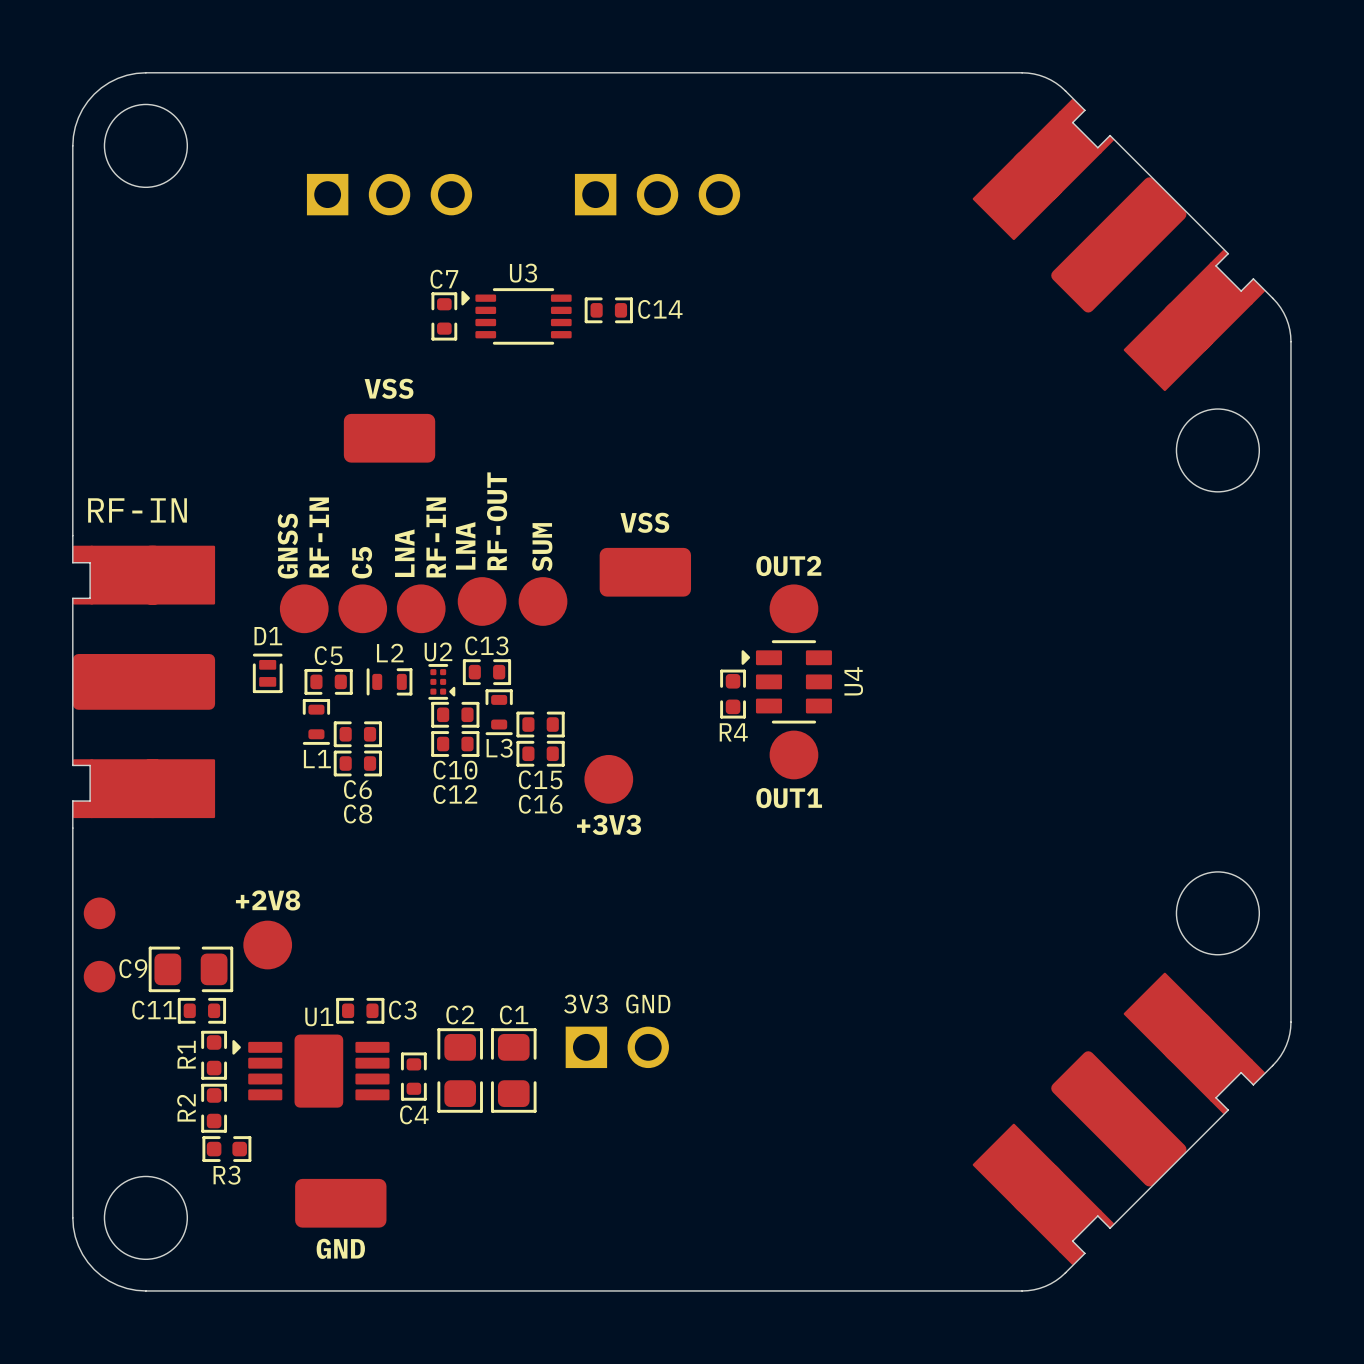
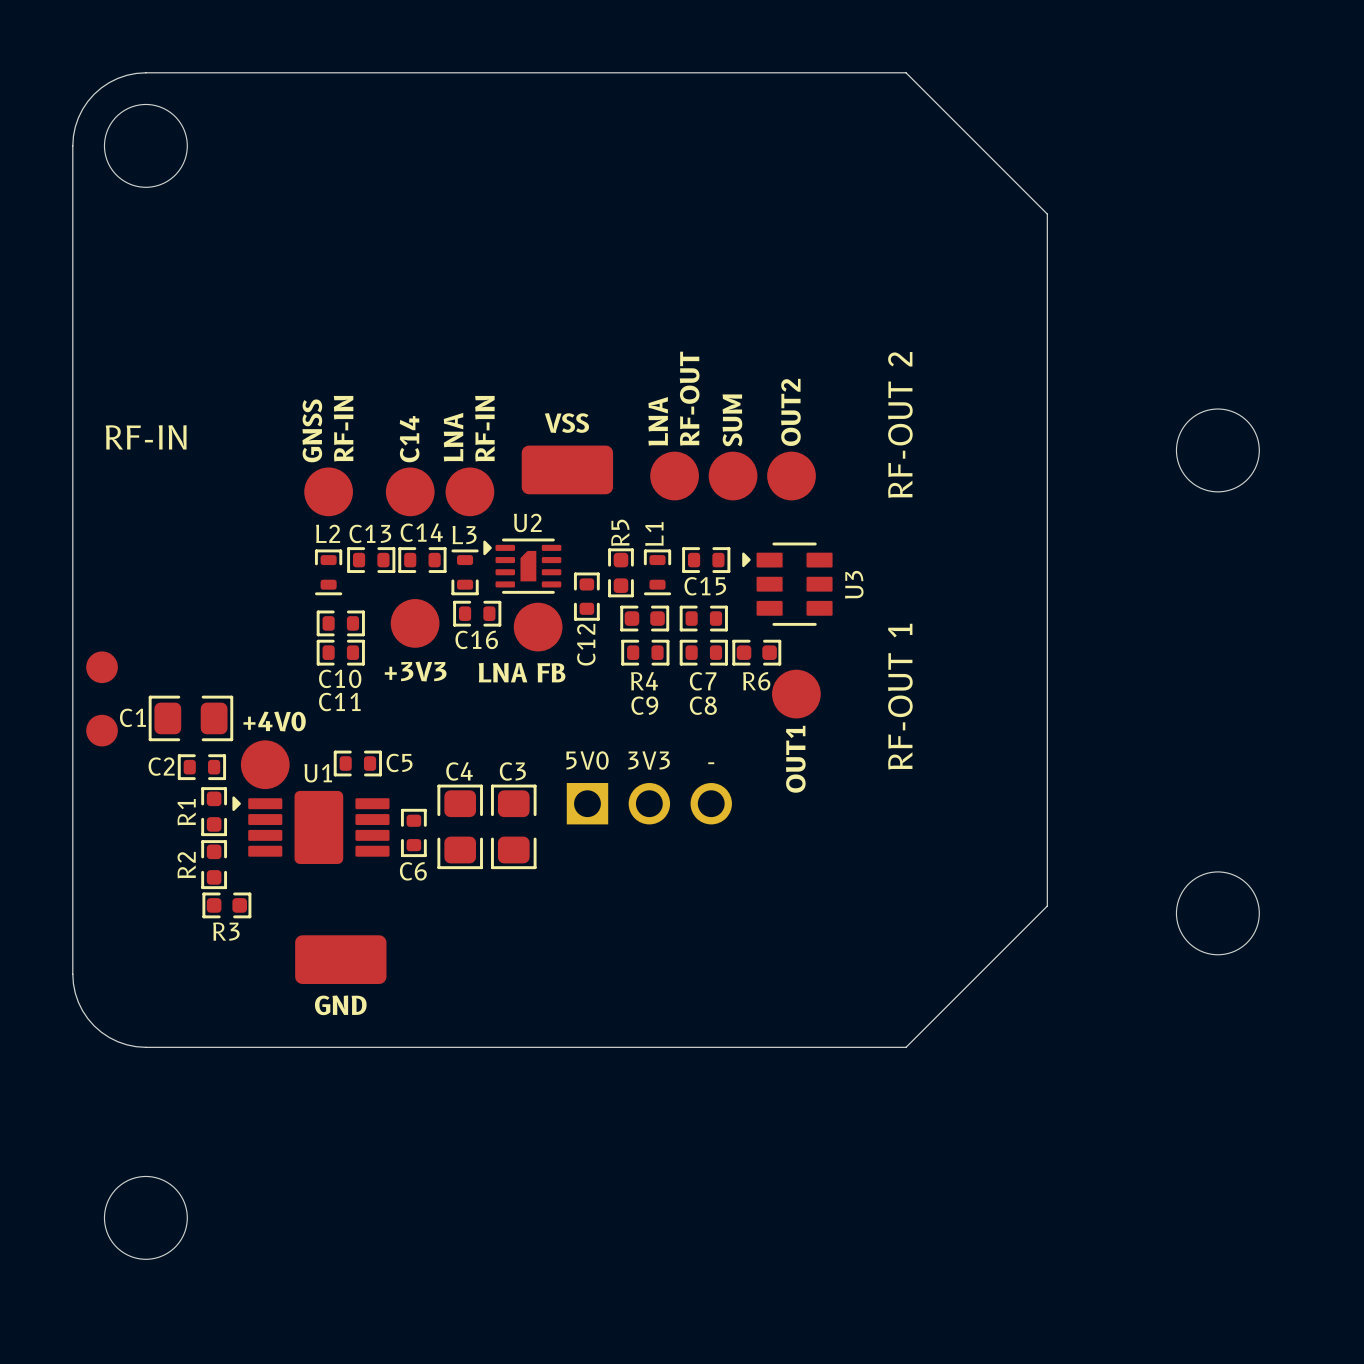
board edge: (906, 72) (1028, 73) (1050, 79) (1065, 91) -> none
part: (389, 194) -> none
part: (657, 194) -> none
part: (1122, 240) -> none
U3 name position: U3 (523, 273) -> U3 (854, 584)
C7 name position: C7 (444, 279) -> C7 (703, 681)
U3 footprint: [461, 288, 572, 345] -> [742, 542, 833, 626]
board edge: (1272, 297) (1286, 318) (1290, 341) (1290, 1022) (1286, 1045) (1272, 1065) -> none
C14 name position: C14 (660, 309) -> C14 (421, 532)
C14 position: (608, 310) -> (422, 560)
C7 rotation: 0° (444, 316) -> 90° clockwise (703, 618)
C7 position: (444, 316) -> (703, 618)
text: VSS (389, 388) -> none
text: none -> RF-IN (343, 428)
text: none -> RF-IN (484, 428)
text: none -> LNA (658, 421)
text: none -> VSS (566, 423)
text: none -> RF-OUT 2 (900, 424)
text: none -> LNA (453, 437)
text: none -> C14 (409, 439)
part: (389, 438) -> none
part: none -> (567, 469)
part: none -> (674, 476)
part: none -> (733, 476)
part: none -> (791, 476)
part: none -> (328, 491)
part: none -> (410, 491)
part: none -> (469, 491)
text position: RF-IN (137, 510) -> RF-IN (146, 437)
text position: RF-OUT (497, 521) -> RF-OUT (689, 398)
text: VSS (644, 522) -> none
board edge: none -> (72, 535) (72, 828)
text: RF-IN (319, 537) -> none
text: RF-IN (436, 537) -> none
text: LNA (465, 545) -> none
text position: GNSS (287, 546) -> GNSS (312, 430)
text position: SUM (542, 547) -> SUM (732, 420)
text: LNA (404, 553) -> none
text: C5 (362, 562) -> none
text rotation: 0° (788, 566) -> 90° counterclockwise (790, 412)
text position: OUT2 (788, 566) -> OUT2 (790, 412)
R5: none -> (620, 572)
part: (645, 572) -> none
part: (482, 601) -> none
part position: (543, 601) -> (538, 627)
part: (304, 608) -> none
part: (362, 608) -> none
part position: (421, 608) -> (415, 623)
part: (793, 608) -> none
C8: none -> (703, 652)
R6: none -> (756, 652)
U2 footprint: [428, 663, 456, 700] -> [483, 538, 562, 594]
C13 position: (486, 672) -> (371, 560)
text: none -> LNA FB (522, 672)
D1: (267, 673) -> none
part: (143, 681) -> none
C5: (328, 681) -> none
L2 rotation: 0° (389, 681) -> 90° counterclockwise (328, 572)
L2 position: (389, 681) -> (328, 572)
U4: (786, 681) -> none
text: none -> RF-OUT 1 (900, 696)
R4 rotation: 0° (733, 694) -> 90° clockwise (644, 618)
R4 position: (733, 694) -> (644, 618)
part: none -> (796, 694)
L3 rotation: 0° (499, 712) -> 180° (465, 572)
L3 position: (499, 712) -> (465, 572)
C10 position: (455, 714) -> (340, 623)
text: none -> +4V0 (274, 721)
L1 position: (316, 721) -> (657, 572)
C15 position: (540, 724) -> (706, 560)
C6 rotation: 0° (357, 734) -> 90° clockwise (413, 832)
C6 position: (357, 734) -> (413, 832)
C12 rotation: 0° (455, 744) -> 90° clockwise (586, 596)
C12 position: (455, 744) -> (586, 596)
C16 position: (540, 753) -> (477, 613)
part: (793, 754) -> none
L1 name rotation: 0° (317, 759) -> 90° counterclockwise (654, 534)
L1 name position: L1 (317, 759) -> L1 (654, 534)
text: none -> 5V0 (587, 760)
text: none -> - (711, 763)
part: none -> (265, 764)
C15 name position: C15 (540, 779) -> C15 (705, 586)
part: (608, 779) -> none
text rotation: 0° (789, 798) -> 90° counterclockwise (795, 759)
part: none -> (649, 803)
C16 name position: C16 (540, 804) -> C16 (476, 639)
C8 name: C8 (358, 813) -> C5 (399, 762)
text position: +3V3 (609, 824) -> +3V3 (415, 671)
text: +2V8 (268, 900) -> none
part position: (99, 945) -> (102, 698)
part: (267, 945) -> none
C9 footprint: [148, 946, 234, 993] -> [621, 639, 670, 666]
C9 name position: C9 (133, 968) -> C9 (644, 705)
board edge: (72, 974) (73, 1227) (78, 1245) (87, 1262) (101, 1275) (126, 1288) (145, 1290) (1022, 1290) (1045, 1286) (1065, 1272) -> (72, 974) (78, 1002) (94, 1025) (117, 1041) (136, 1046) (906, 1047) (1047, 906) (1047, 214) (906, 72)
C3 footprint: [336, 997, 385, 1024] -> [491, 784, 537, 870]
text position: 3V3 (585, 1004) -> 3V3 (649, 760)
text: GND (648, 1004) -> none
text: none -> GND (340, 1005)
C11 name position: C11 (154, 1010) -> C11 (339, 702)
C11 position: (201, 1010) -> (340, 652)
C3 name position: C3 (402, 1010) -> C3 (512, 771)
C2 name position: C2 (460, 1014) -> C2 (161, 766)
C1 name position: C1 (514, 1014) -> C1 (132, 717)
C2 footprint: [437, 1028, 483, 1113] -> [177, 754, 227, 781]
part: (617, 1047) -> none
C4 footprint: [400, 1052, 427, 1101] -> [437, 784, 483, 870]
R1 position: (214, 1055) -> (214, 811)
C1 rotation: 0° (513, 1070) -> 90° clockwise (190, 718)
C1 position: (513, 1070) -> (190, 718)
U1 position: (310, 1071) -> (310, 827)
R2 position: (214, 1108) -> (214, 864)
C4 name position: C4 (414, 1114) -> C4 (459, 771)
part: (1122, 1122) -> none
R3 position: (226, 1149) -> (226, 905)
part position: (340, 1203) -> (340, 959)
text: GND (340, 1248) -> none

